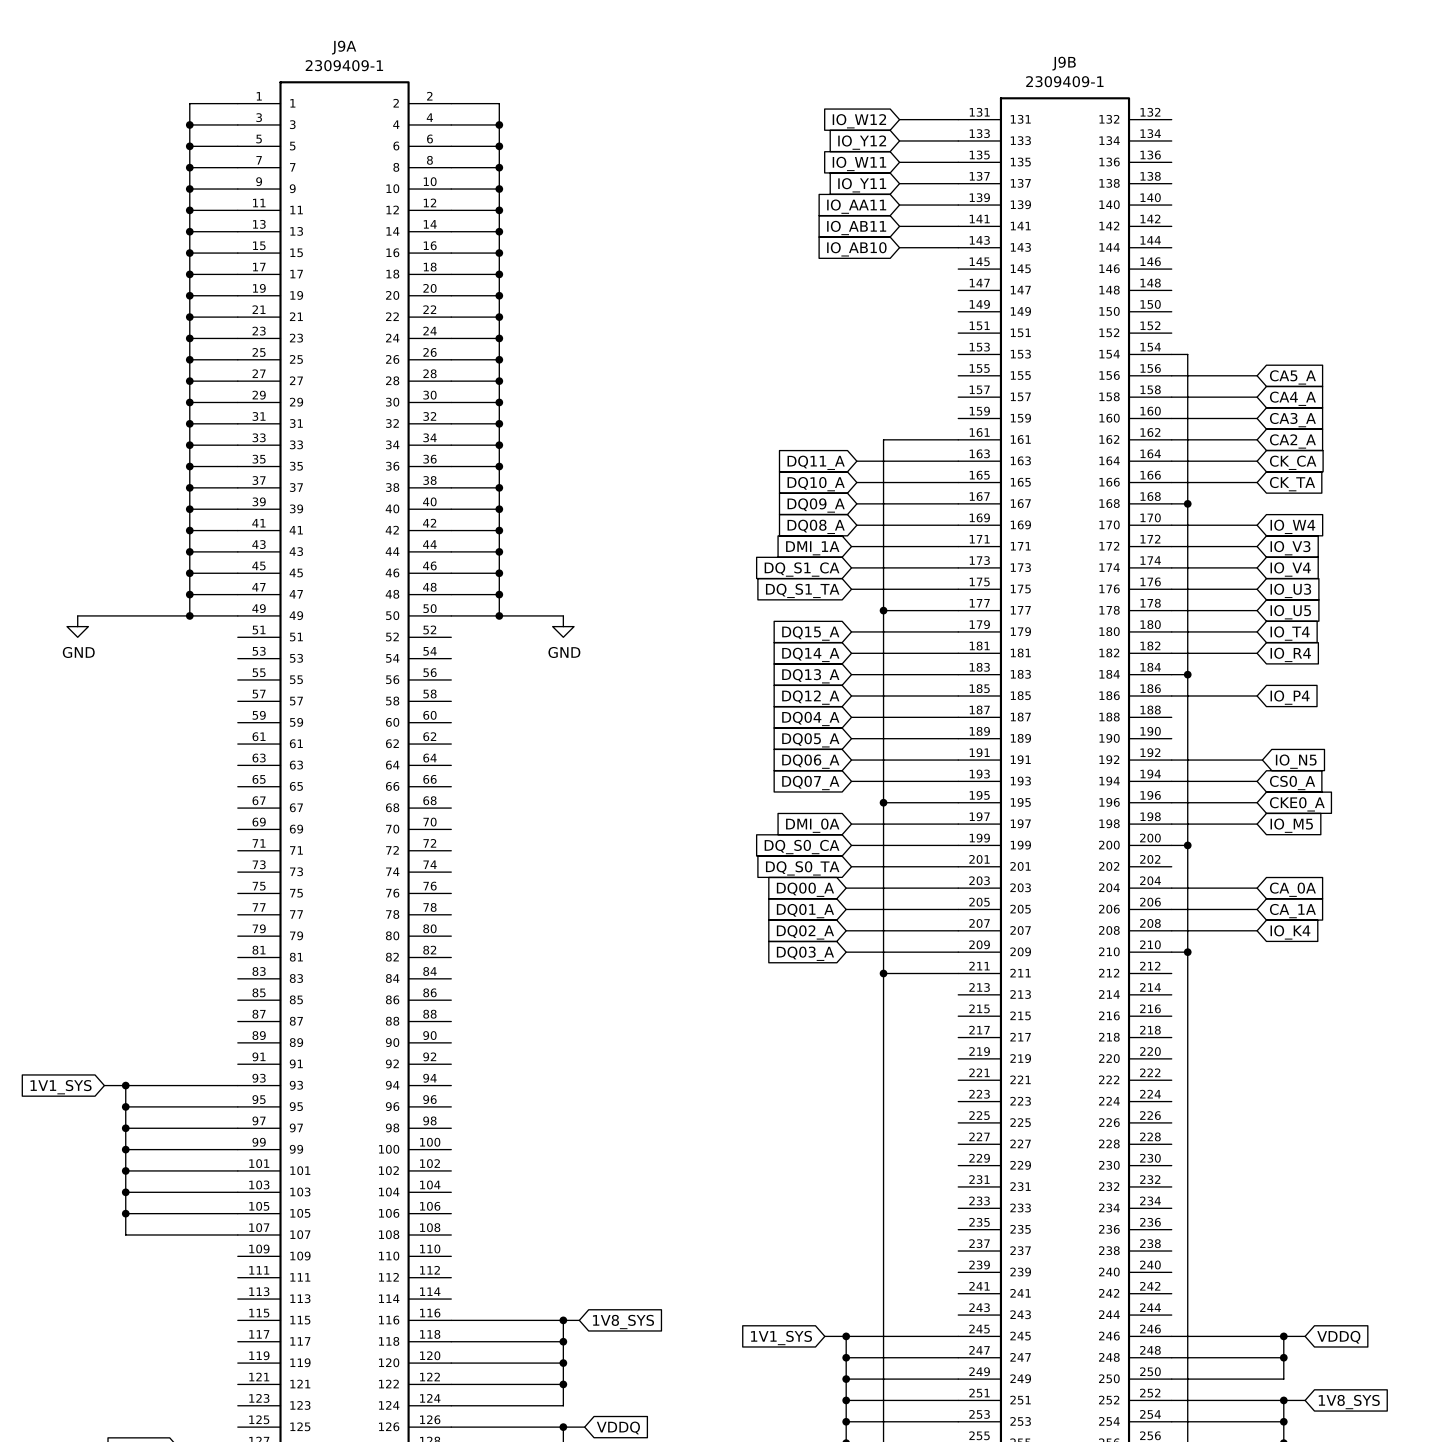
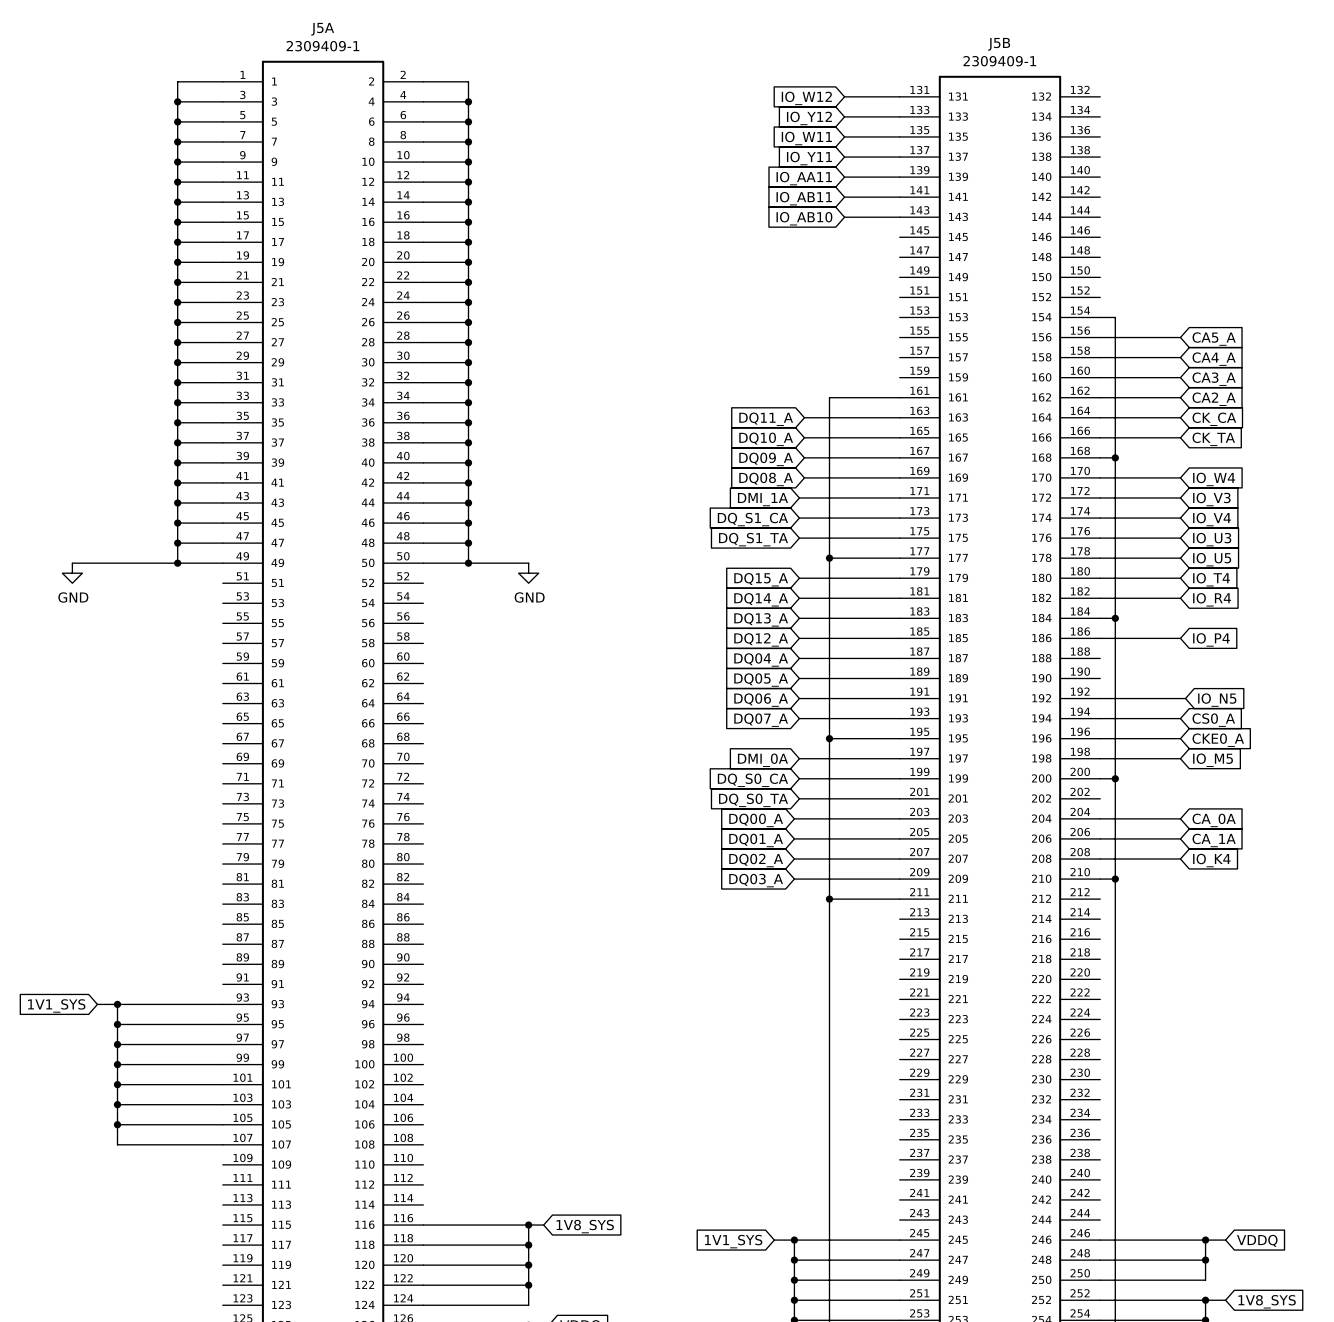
J9A name: J9A (344, 47) -> J5A (322, 29)
J9B name: J9B (1064, 63) -> J5B (999, 44)

